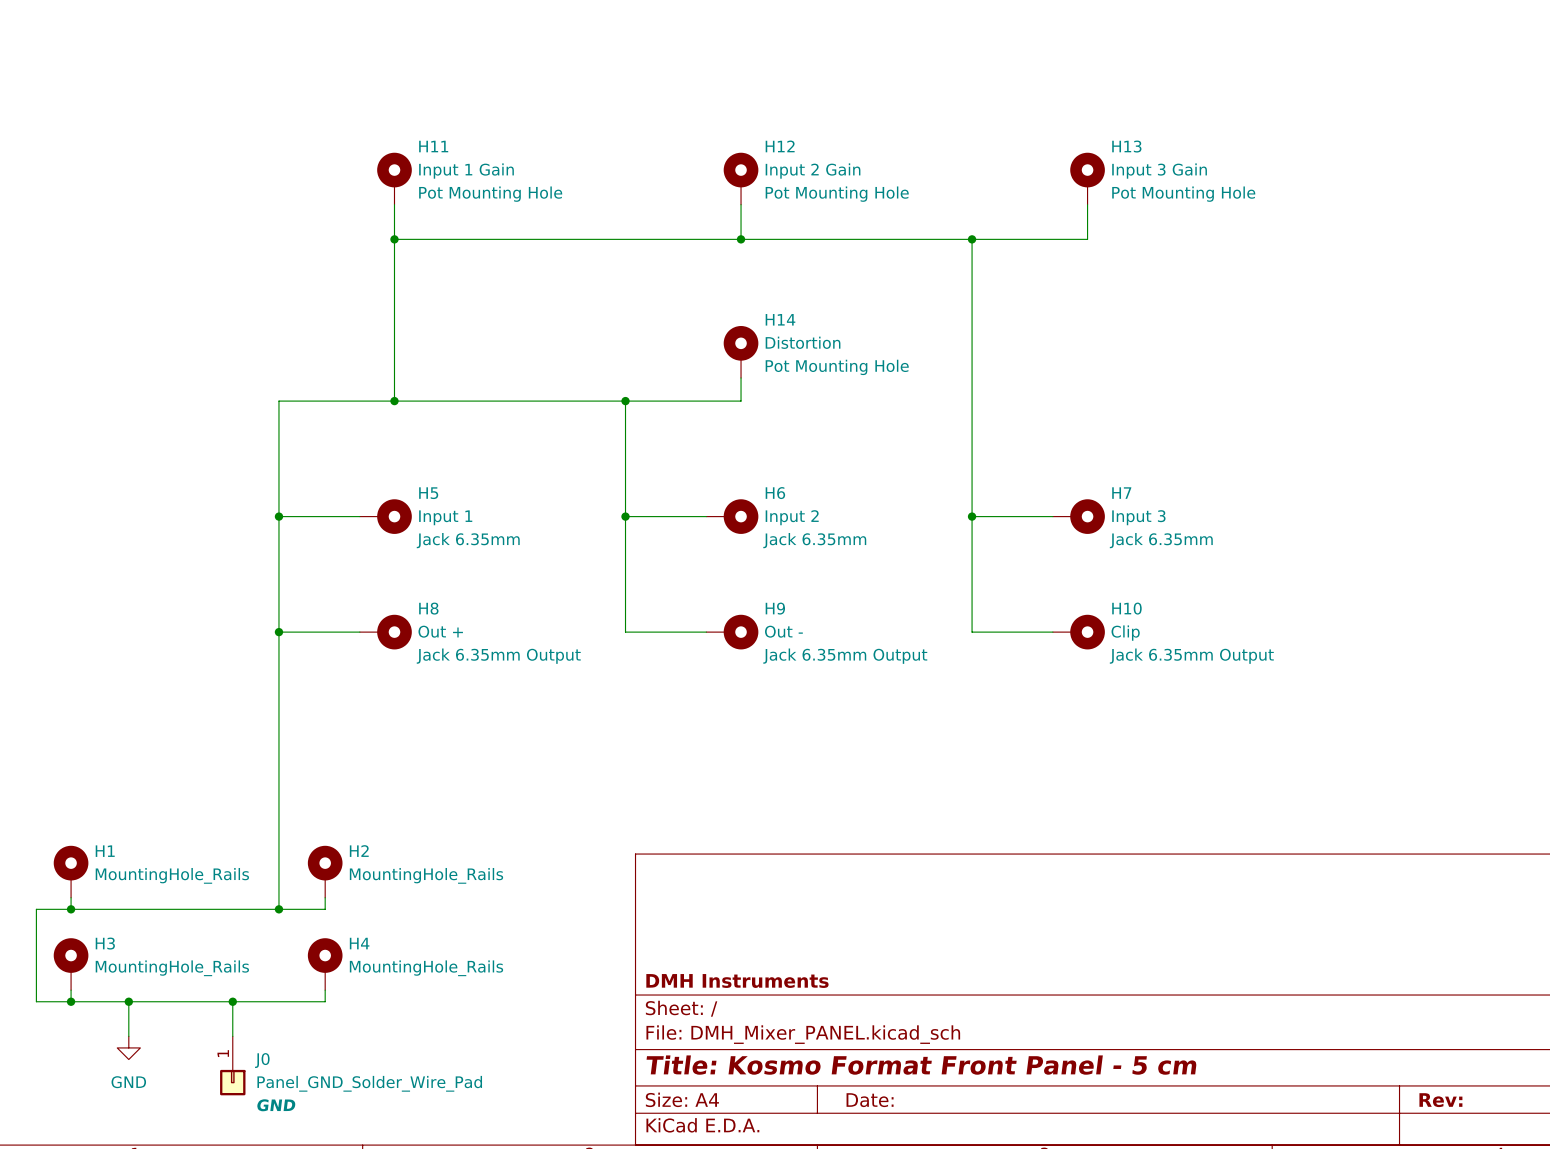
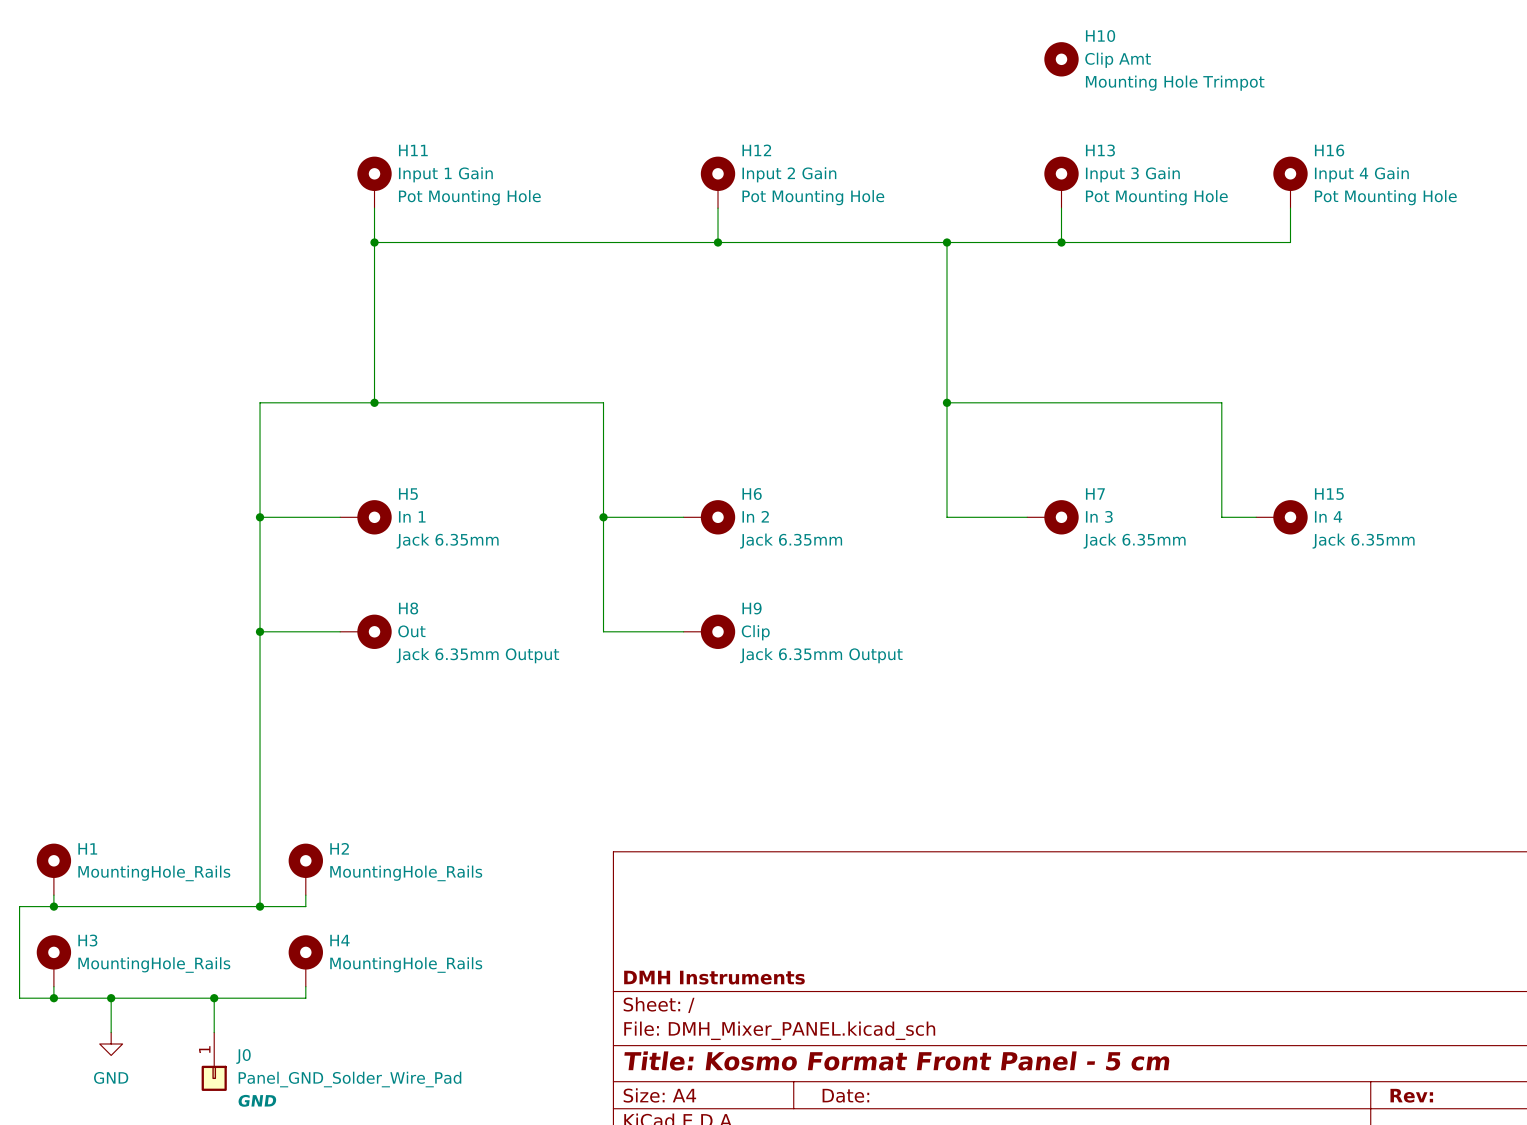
H16: none -> Input 4 Gain (1290, 182)
wire: none -> (1290, 208) (1290, 242) (1061, 242)
junction: none -> (1061, 242)
H14: Distortion (741, 351) -> none
wire: (741, 377) (741, 401) (625, 401) -> none
junction: (625, 401) -> none
wire: none -> (947, 402) (1221, 402) (1221, 517) (1256, 517)
junction: none -> (947, 402)
wire: (972, 516) (972, 632) (1052, 632) -> none
junction: (972, 516) -> none
H15: none -> In 4 (1281, 517)
H5 value: Input 1 (445, 517) -> In 1 (412, 516)
H6 value: Input 2 (792, 517) -> In 2 (755, 516)
H7 value: Input 3 (1138, 517) -> In 3 (1099, 516)
H10 symbol: [1052, 614, 1105, 650] -> [1044, 42, 1079, 77]
H8 value: Out + (440, 631) -> Out (411, 631)
H9 value: Out - (783, 631) -> Clip (755, 632)
H10 value: Clip (1125, 633) -> Clip Amt (1118, 60)
H10 text: Jack 6.35mm Output (1191, 656) -> Mounting Hole Trimpot (1175, 83)

